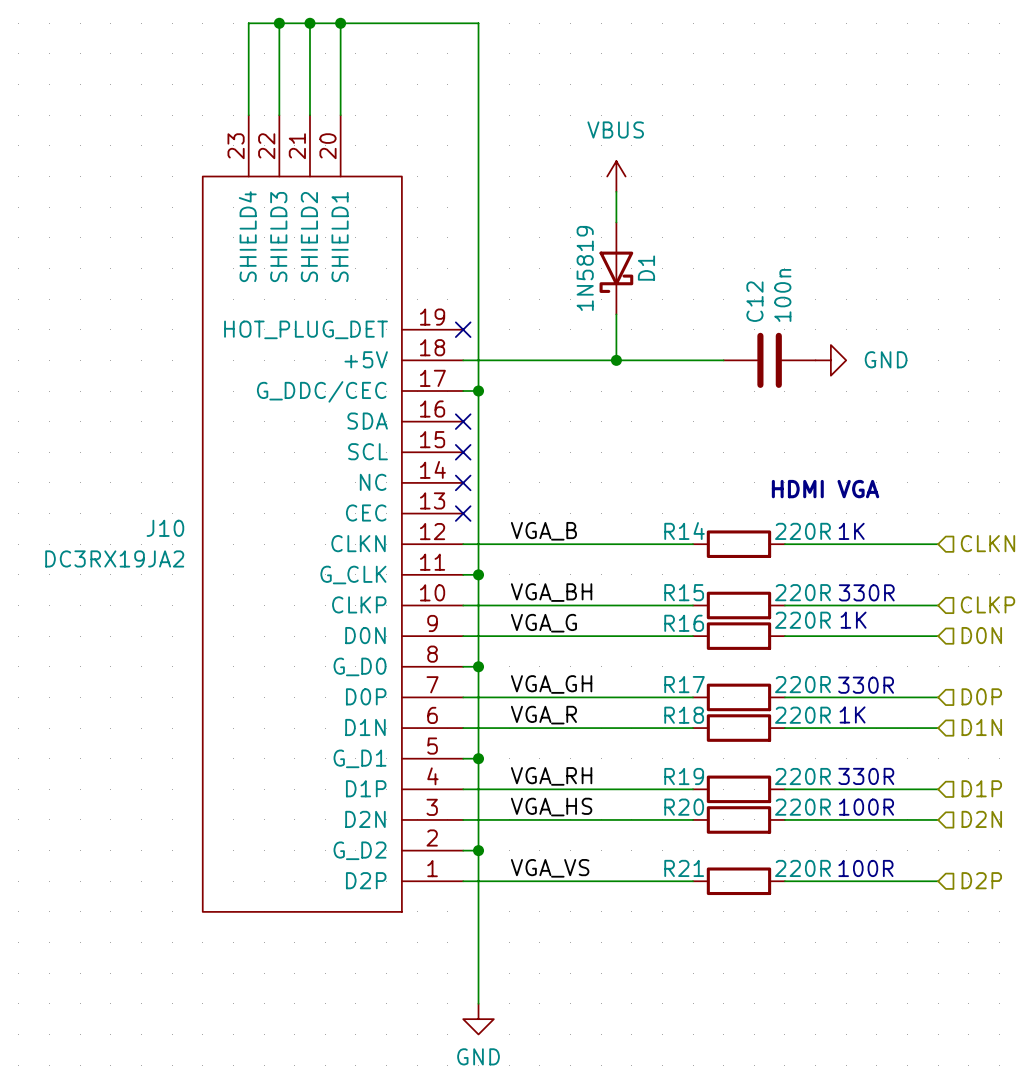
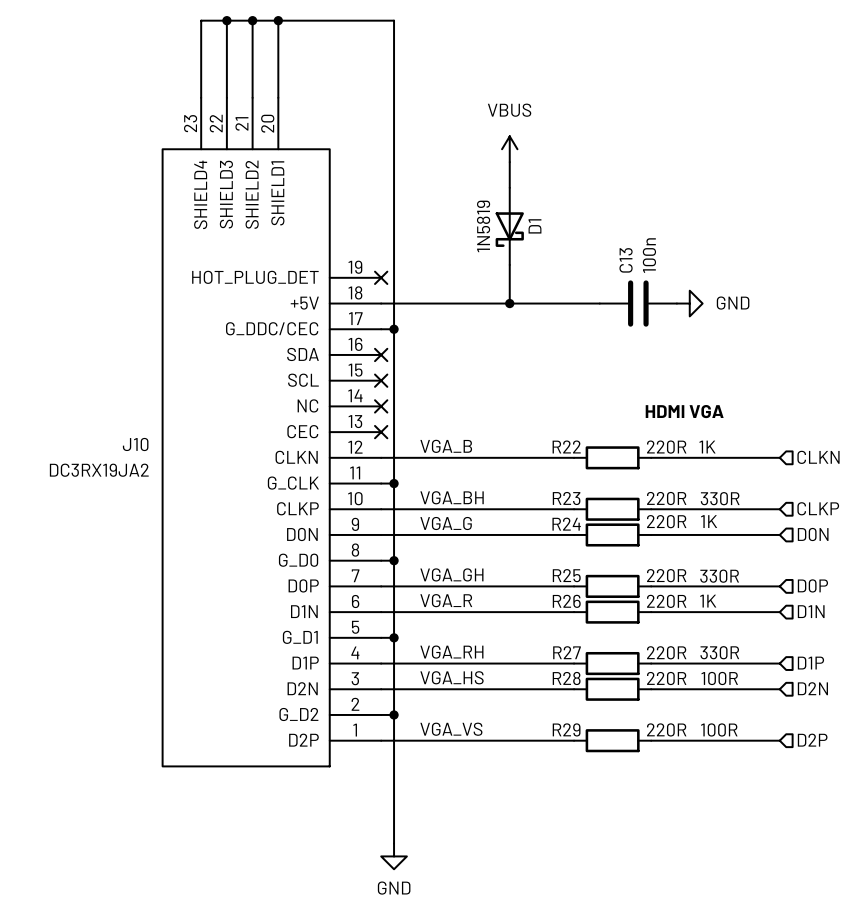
C12 name: C12 (754, 301) -> C13 (626, 260)
R14 name: R14 (684, 531) -> R22 (566, 446)
R15 name: R15 (684, 592) -> R23 (566, 498)
R16 name: R16 (684, 623) -> R24 (566, 524)
R17 name: R17 (684, 684) -> R25 (566, 575)
R18 name: R18 (684, 715) -> R26 (566, 601)
R19 name: R19 (684, 776) -> R27 (566, 652)
R20 name: R20 (684, 807) -> R28 (566, 678)
R21 name: R21 (684, 868) -> R29 (566, 729)

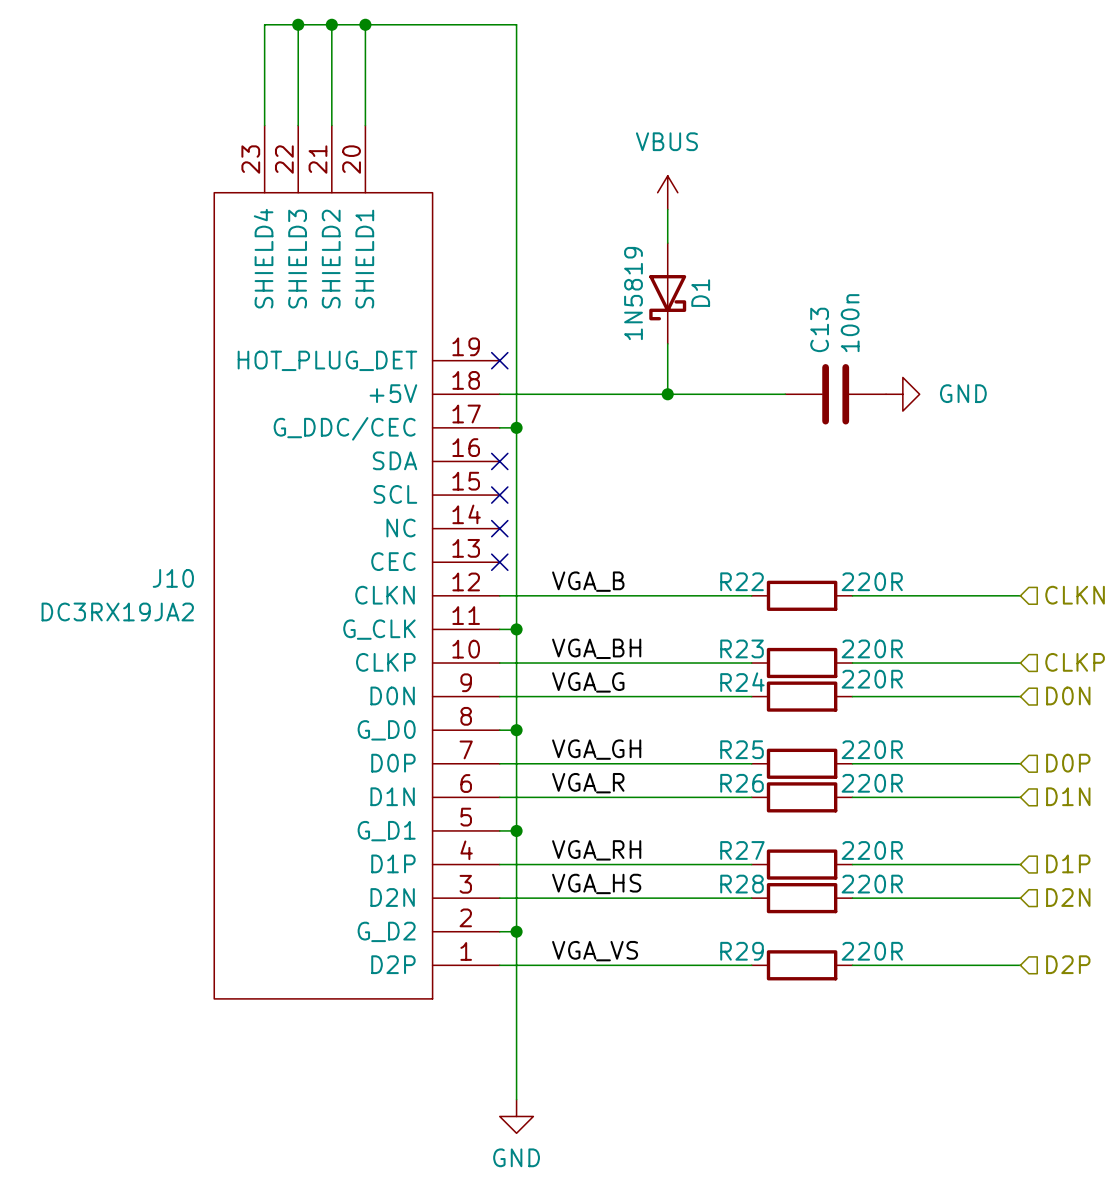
text: HDMI VGA (684, 411) -> none
text: 1K (707, 447) -> none
text: 330R (720, 498) -> none
text: 1K (709, 521) -> none
text: 330R (719, 576) -> none
text: 1K (708, 601) -> none
text: 330R (719, 652) -> none
text: 100R (719, 678) -> none
text: 100R (719, 729) -> none

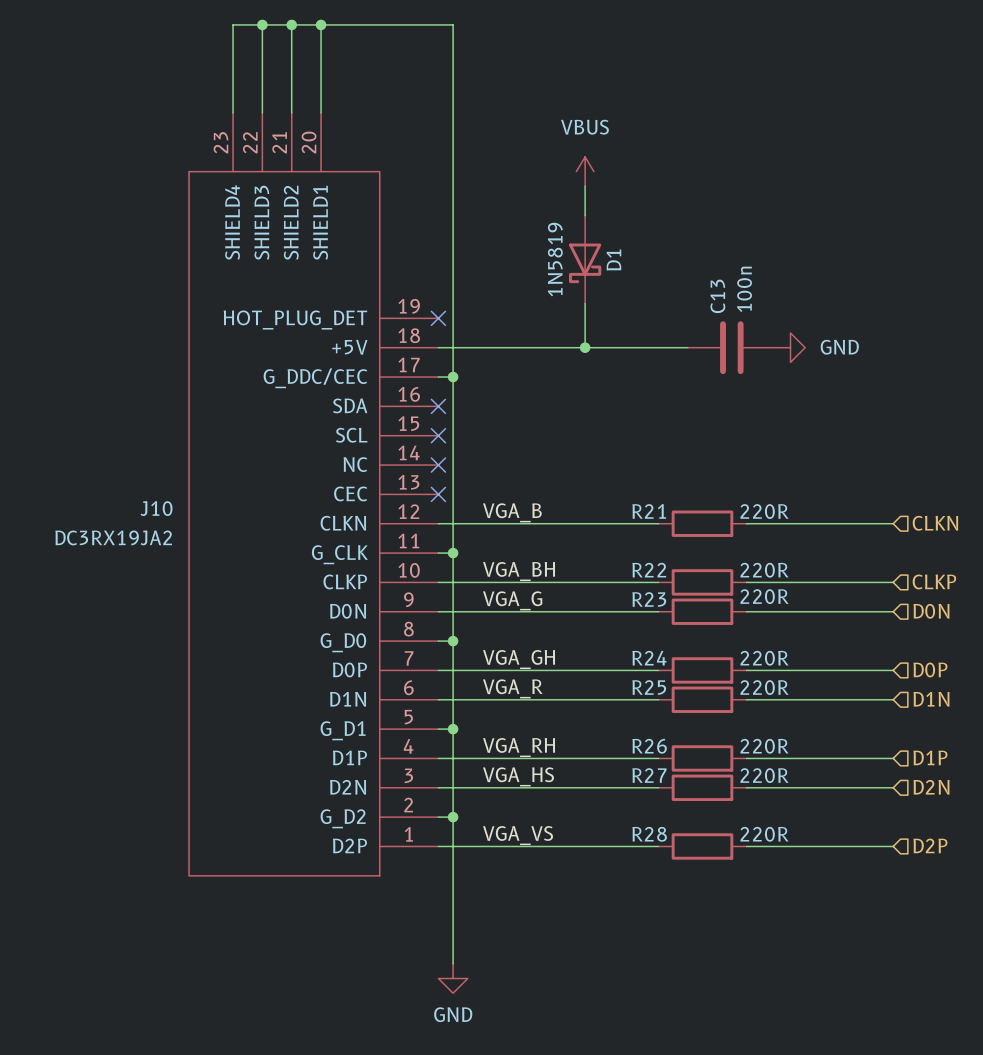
R22 name: R22 (742, 581) -> R21 (649, 511)
R23 name: R23 (742, 648) -> R22 (649, 570)
R24 name: R24 (742, 682) -> R23 (649, 599)
R25 name: R25 (742, 749) -> R24 (649, 658)
R26 name: R26 (742, 783) -> R25 (649, 687)
R27 name: R27 (742, 850) -> R26 (649, 746)
R28 name: R28 (742, 884) -> R27 (649, 775)
R29 name: R29 (742, 951) -> R28 (649, 834)

